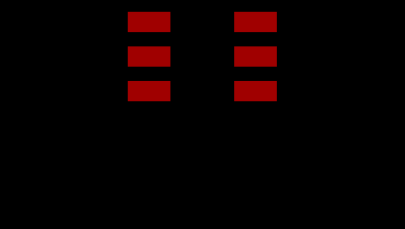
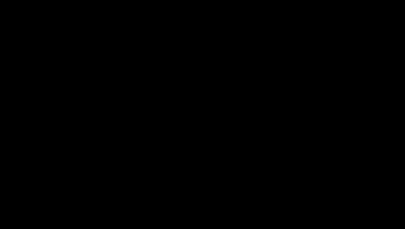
part: (202, 56) -> none

